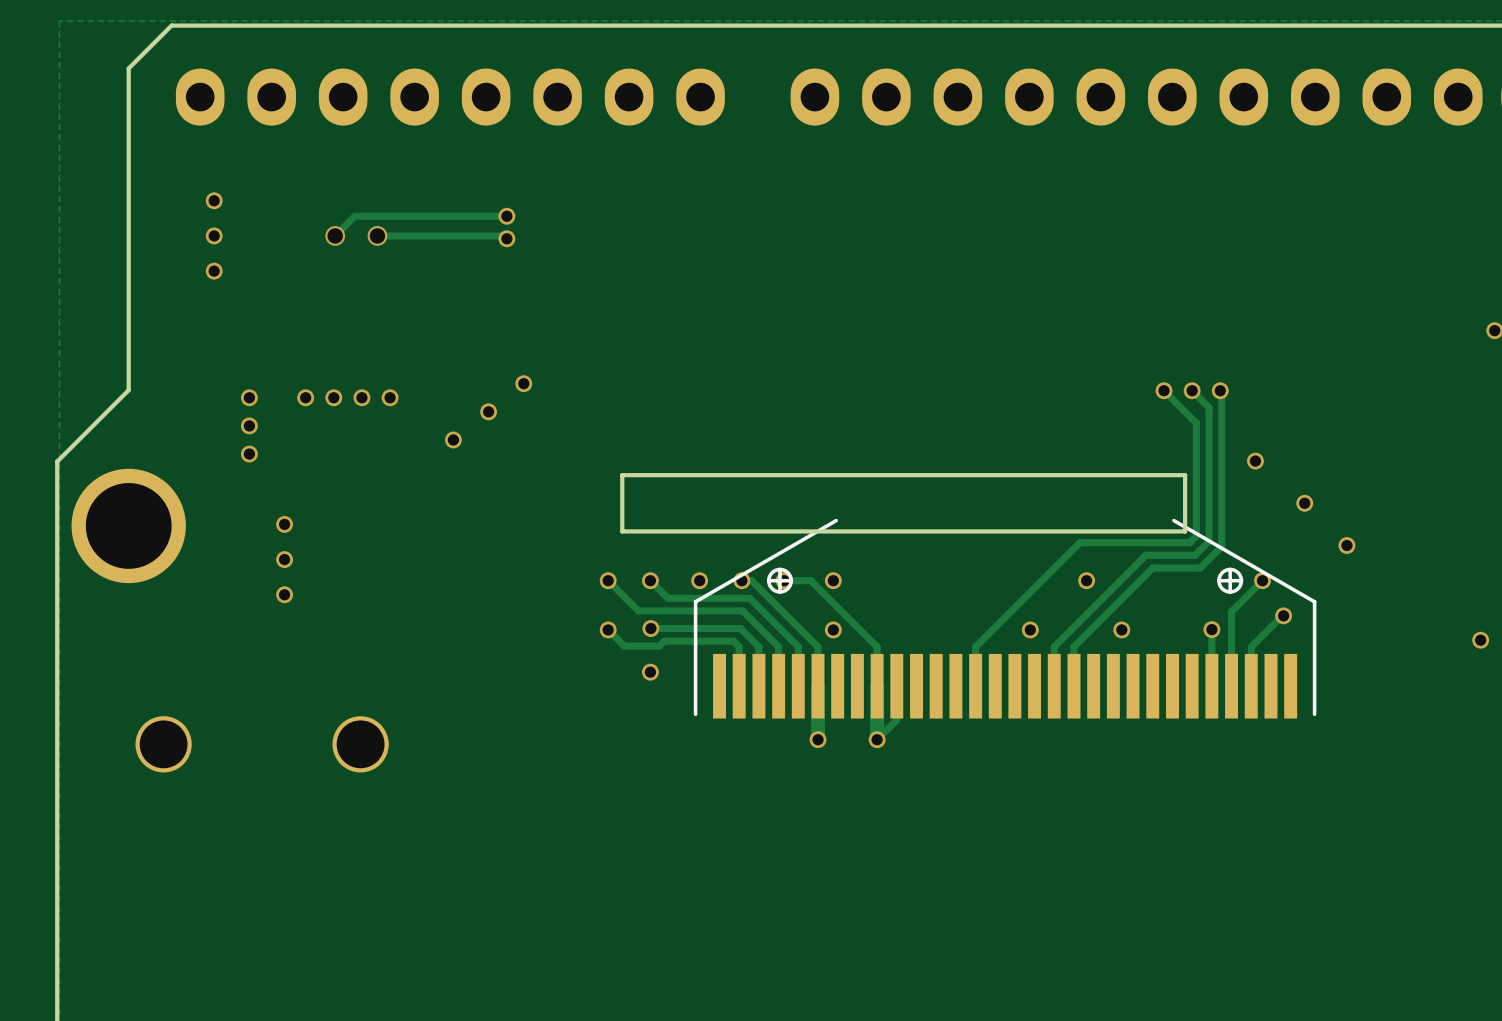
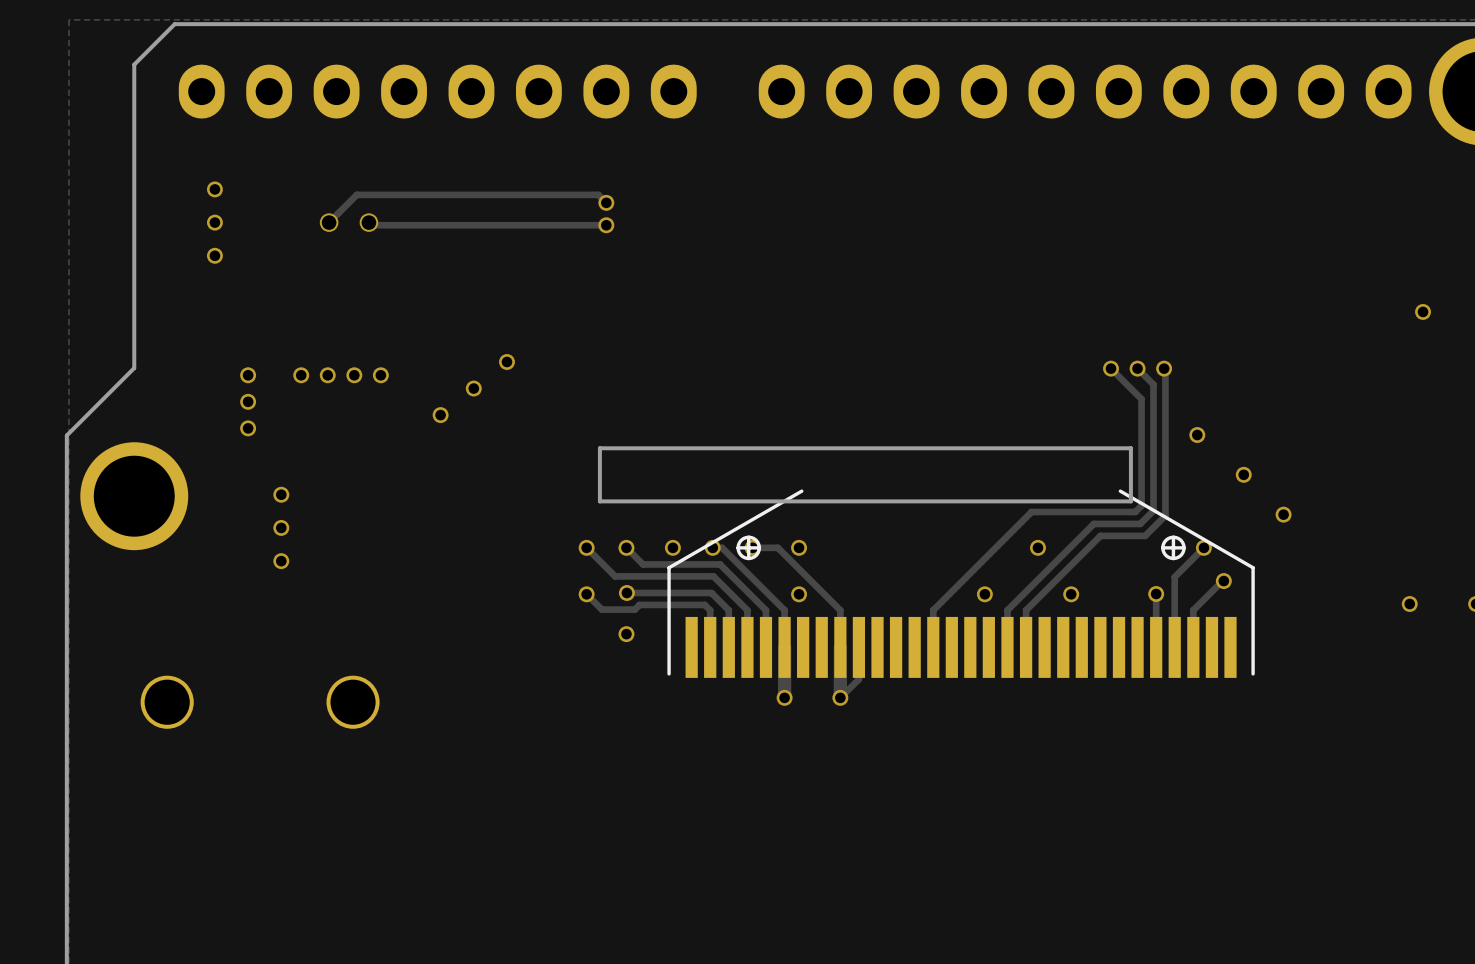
via: none -> (606, 202)
track: (506, 216) (354, 216) -> (606, 202) (598, 194) (356, 194) (347, 204)
via: (506, 216) -> none
track: (377, 235) (504, 235) (506, 238) -> (368, 222) (371, 225) (606, 225)
via: (506, 238) -> none
via: none -> (606, 225)

